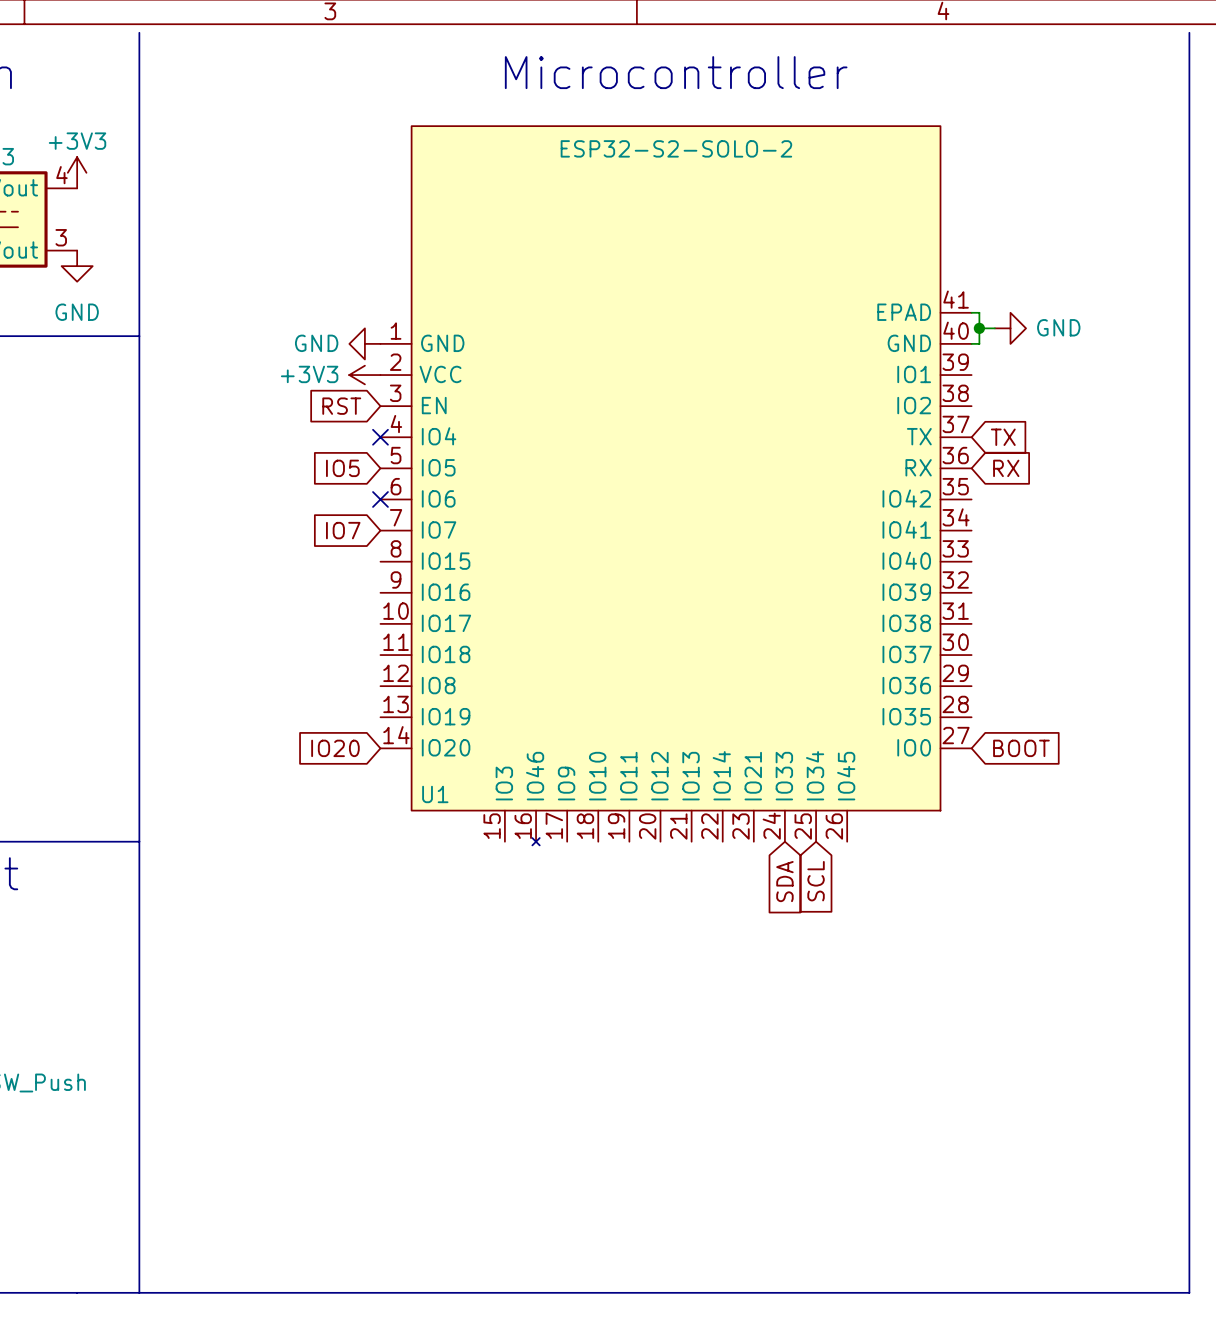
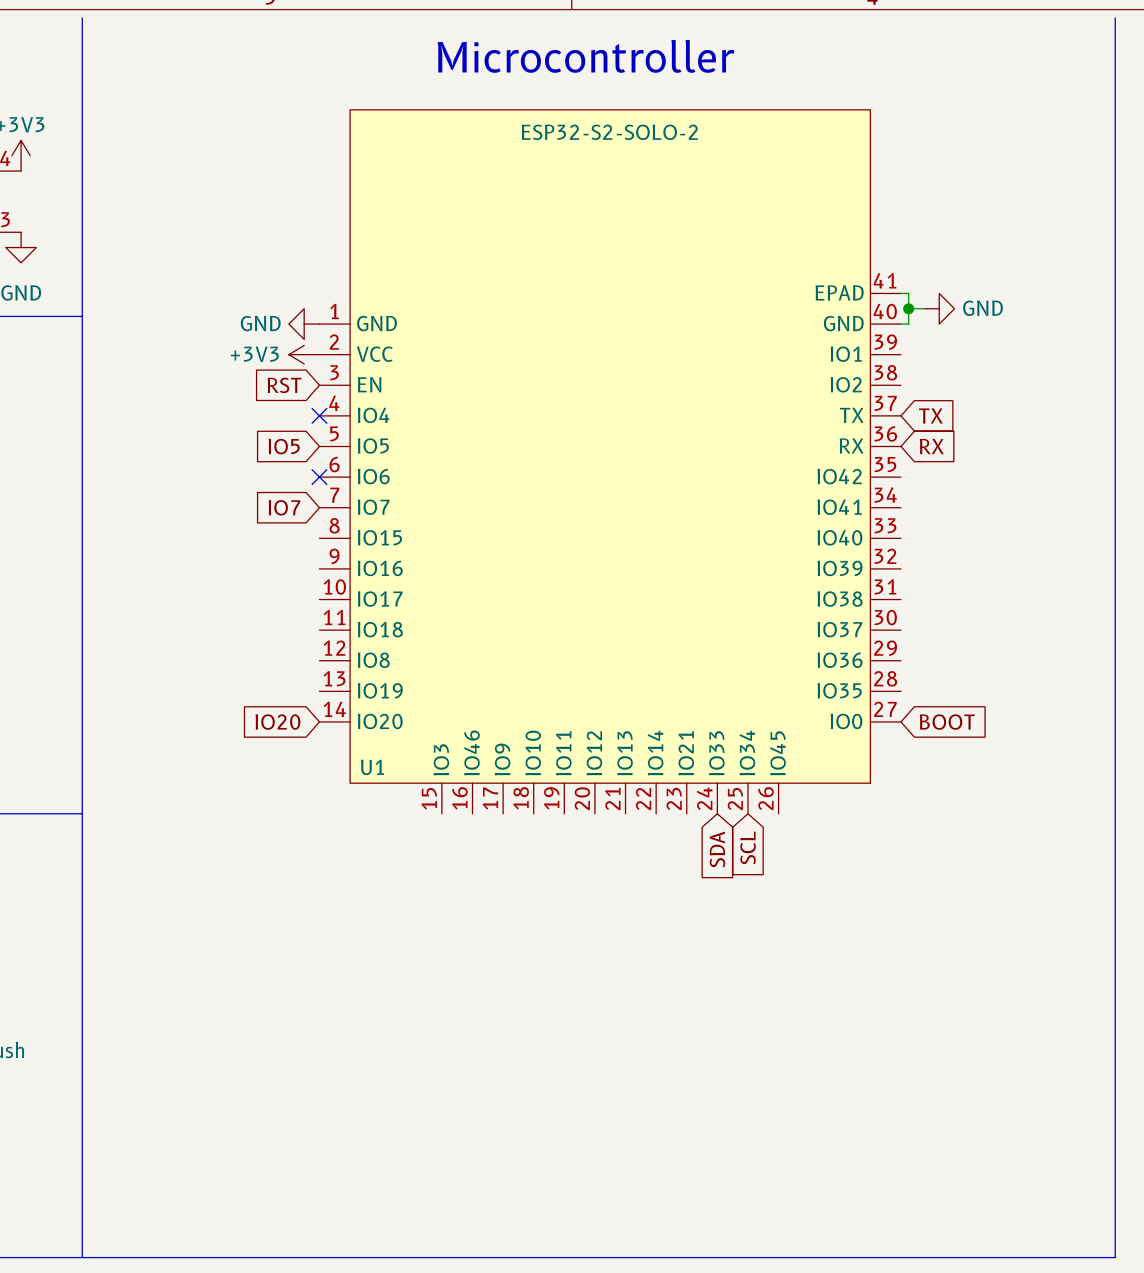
U1 symbol: [380, 126, 972, 846] -> [319, 109, 902, 814]

